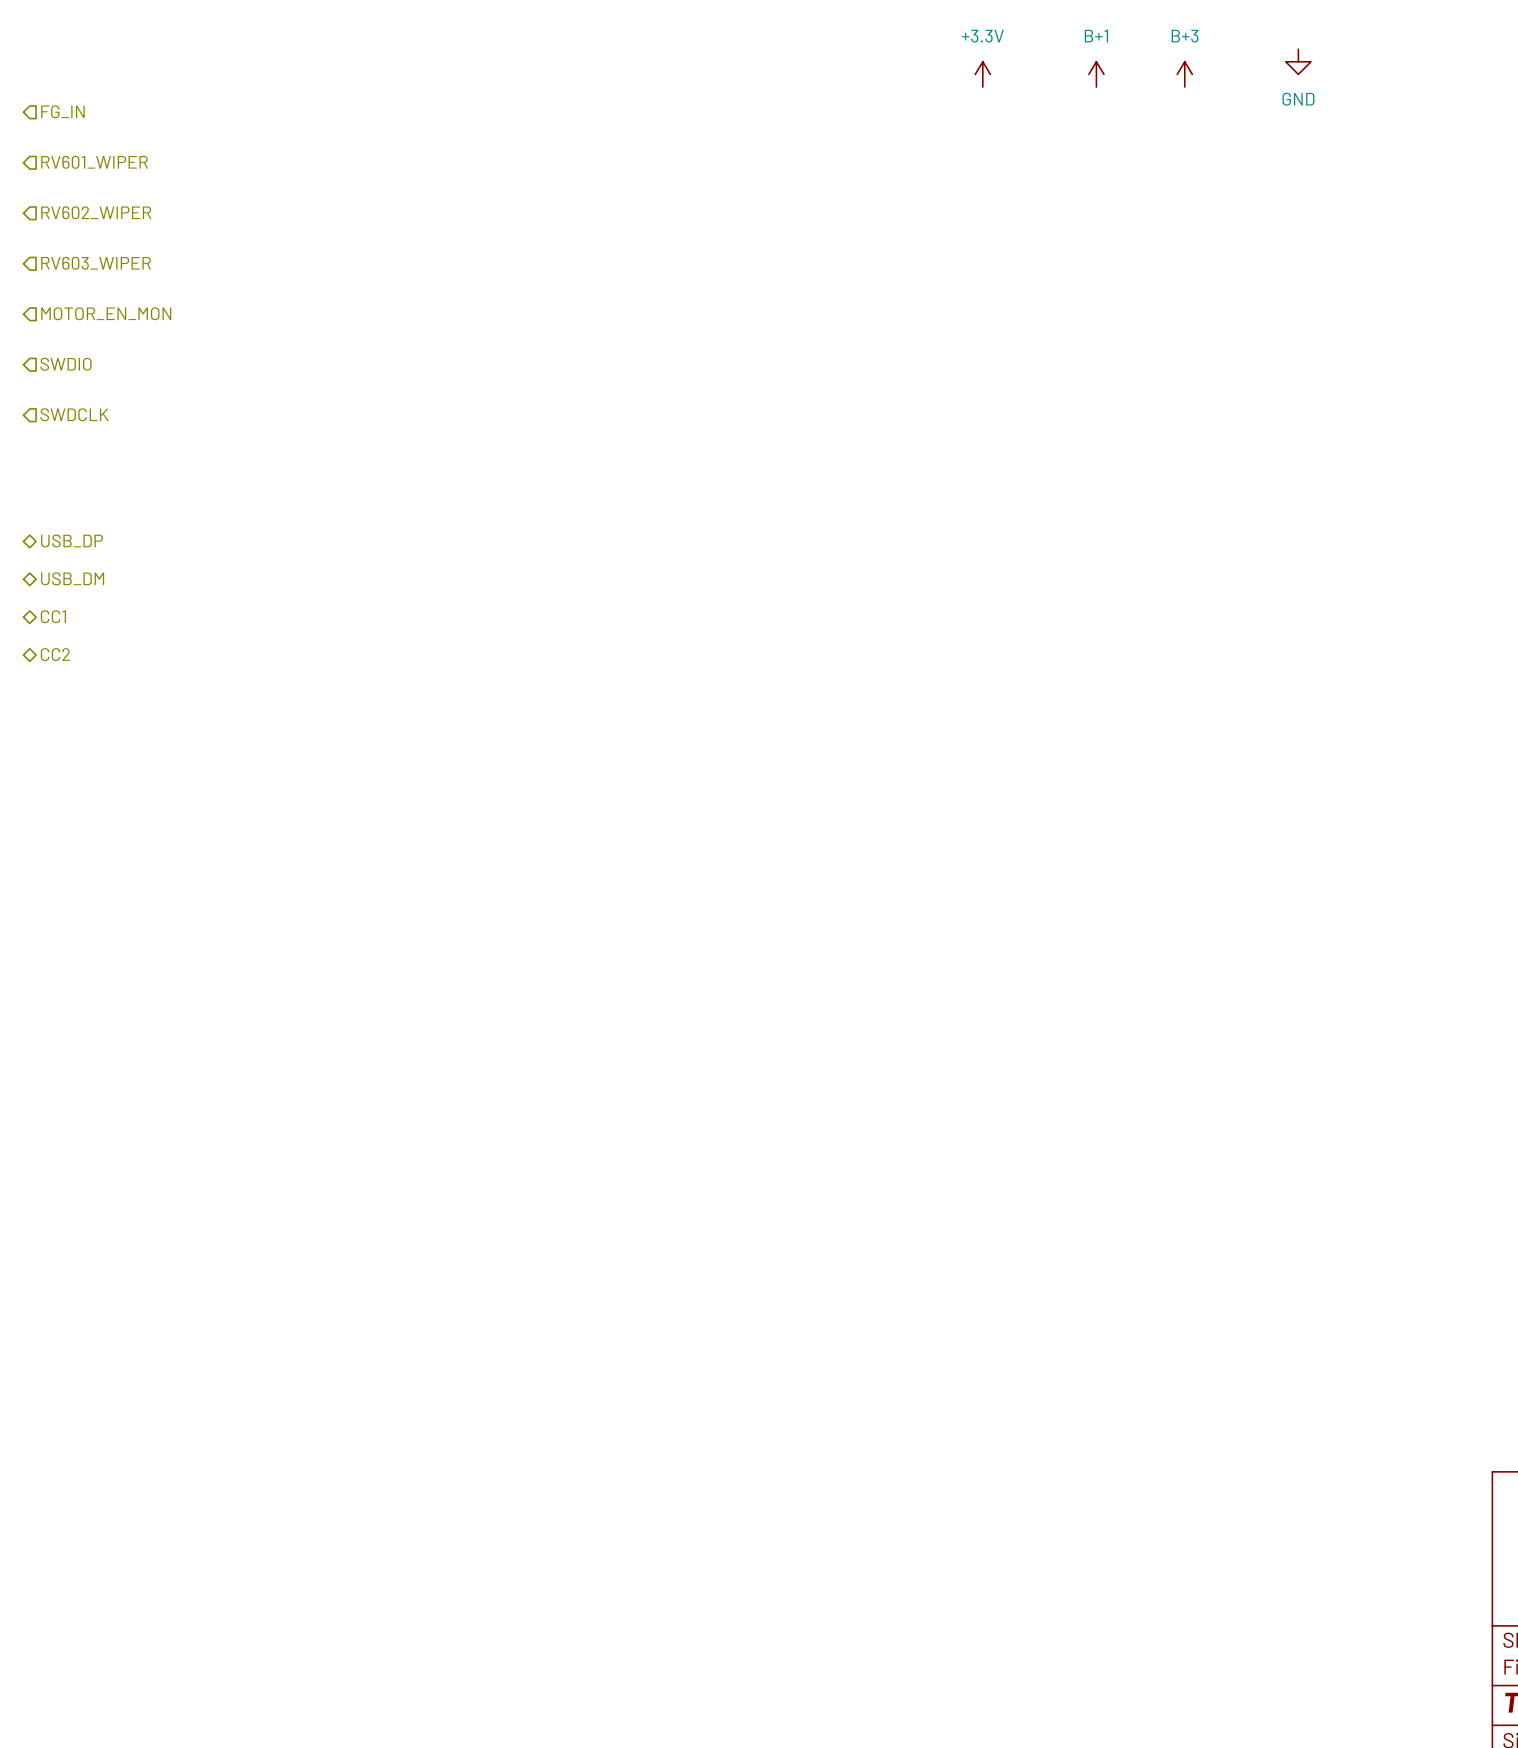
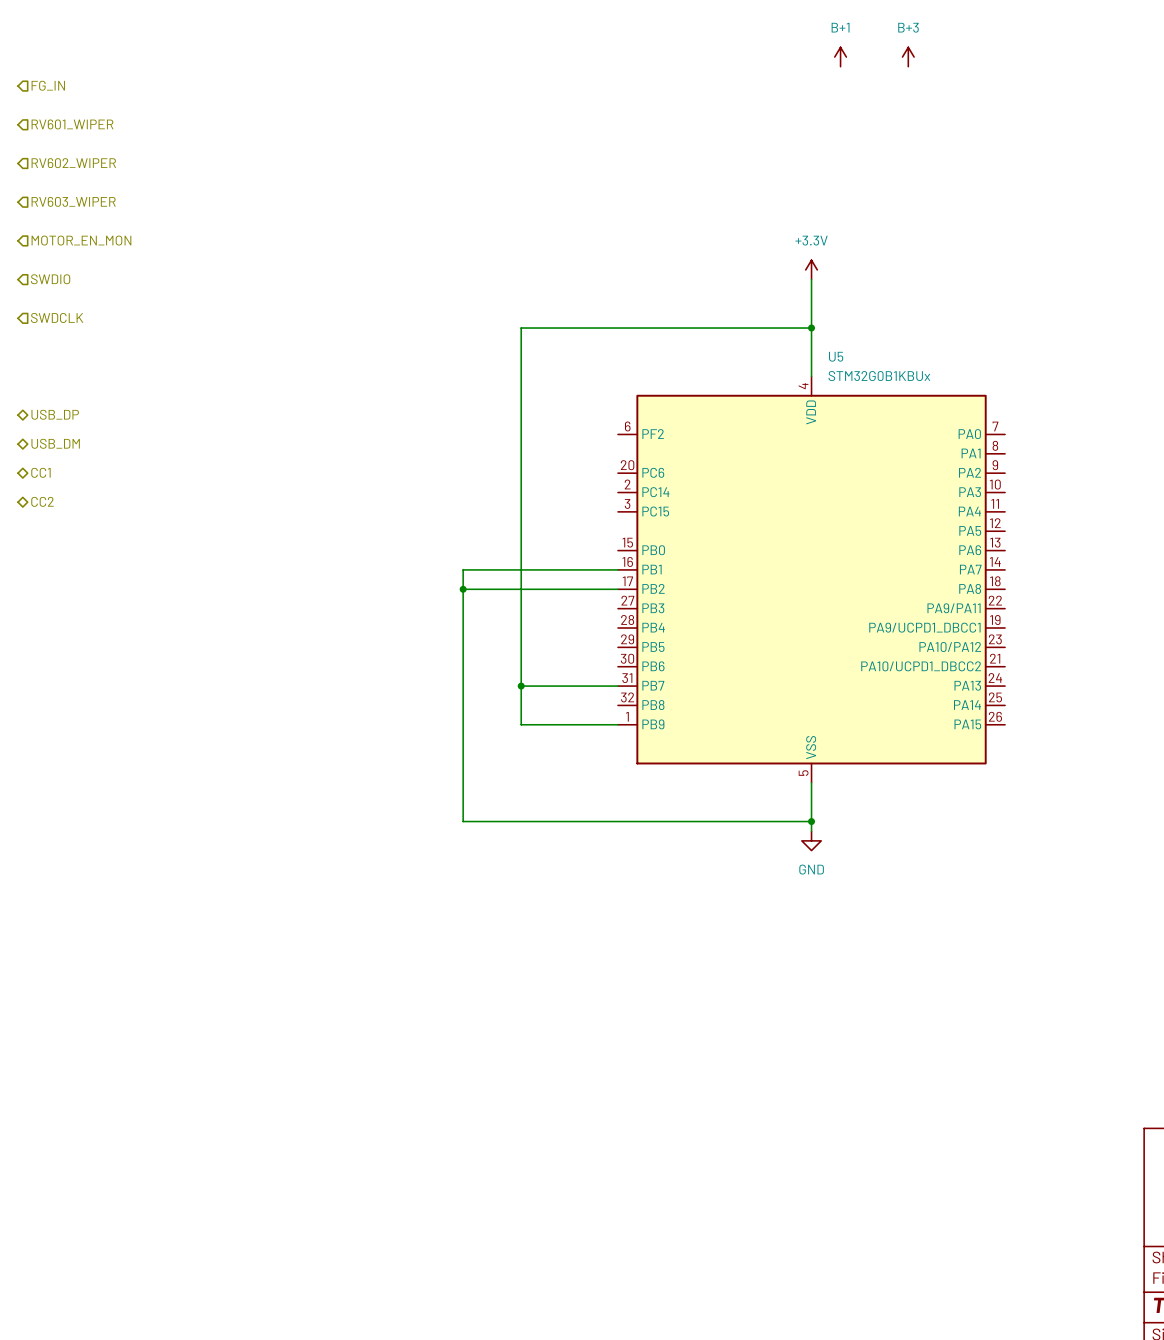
power symbol: GND (1298, 61) -> none
power symbol: +3.3V (982, 74) -> none
power symbol: none -> +3.3V (811, 269)
wire: none -> (811, 279) (811, 376)
wire: none -> (811, 328) (521, 328) (521, 724) (617, 724)
junction: none -> (811, 328)
wire: none -> (617, 569) (463, 569) (463, 821) (811, 821)
U5: none -> STM32G0B1KBUx (811, 579)
wire: none -> (463, 589) (617, 589)
junction: none -> (463, 589)
wire: none -> (521, 686) (617, 686)
junction: none -> (521, 686)
wire: none -> (811, 782) (811, 831)
junction: none -> (811, 821)
power symbol: none -> GND (811, 840)

